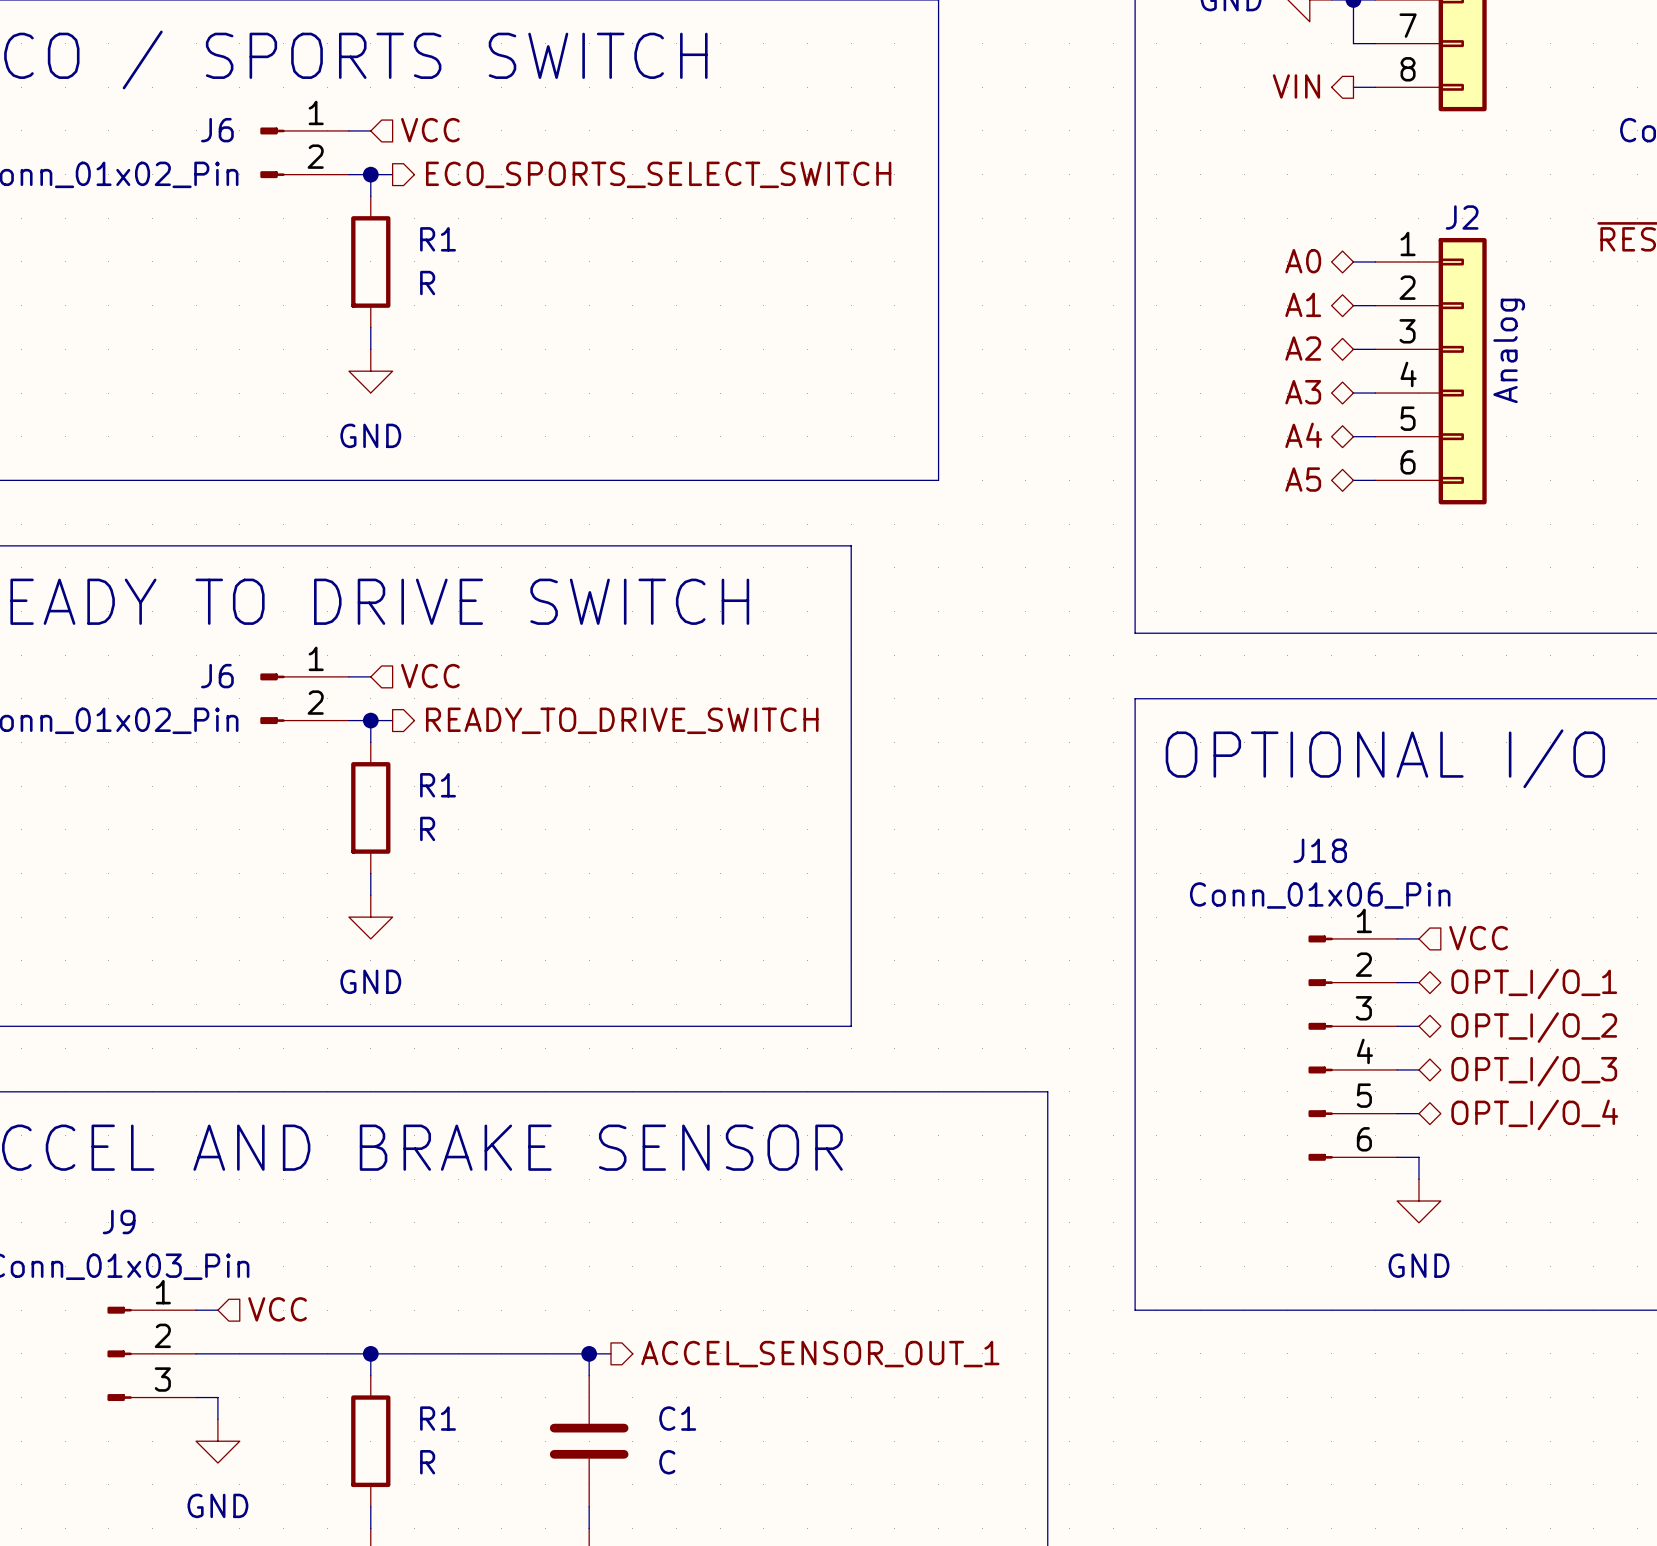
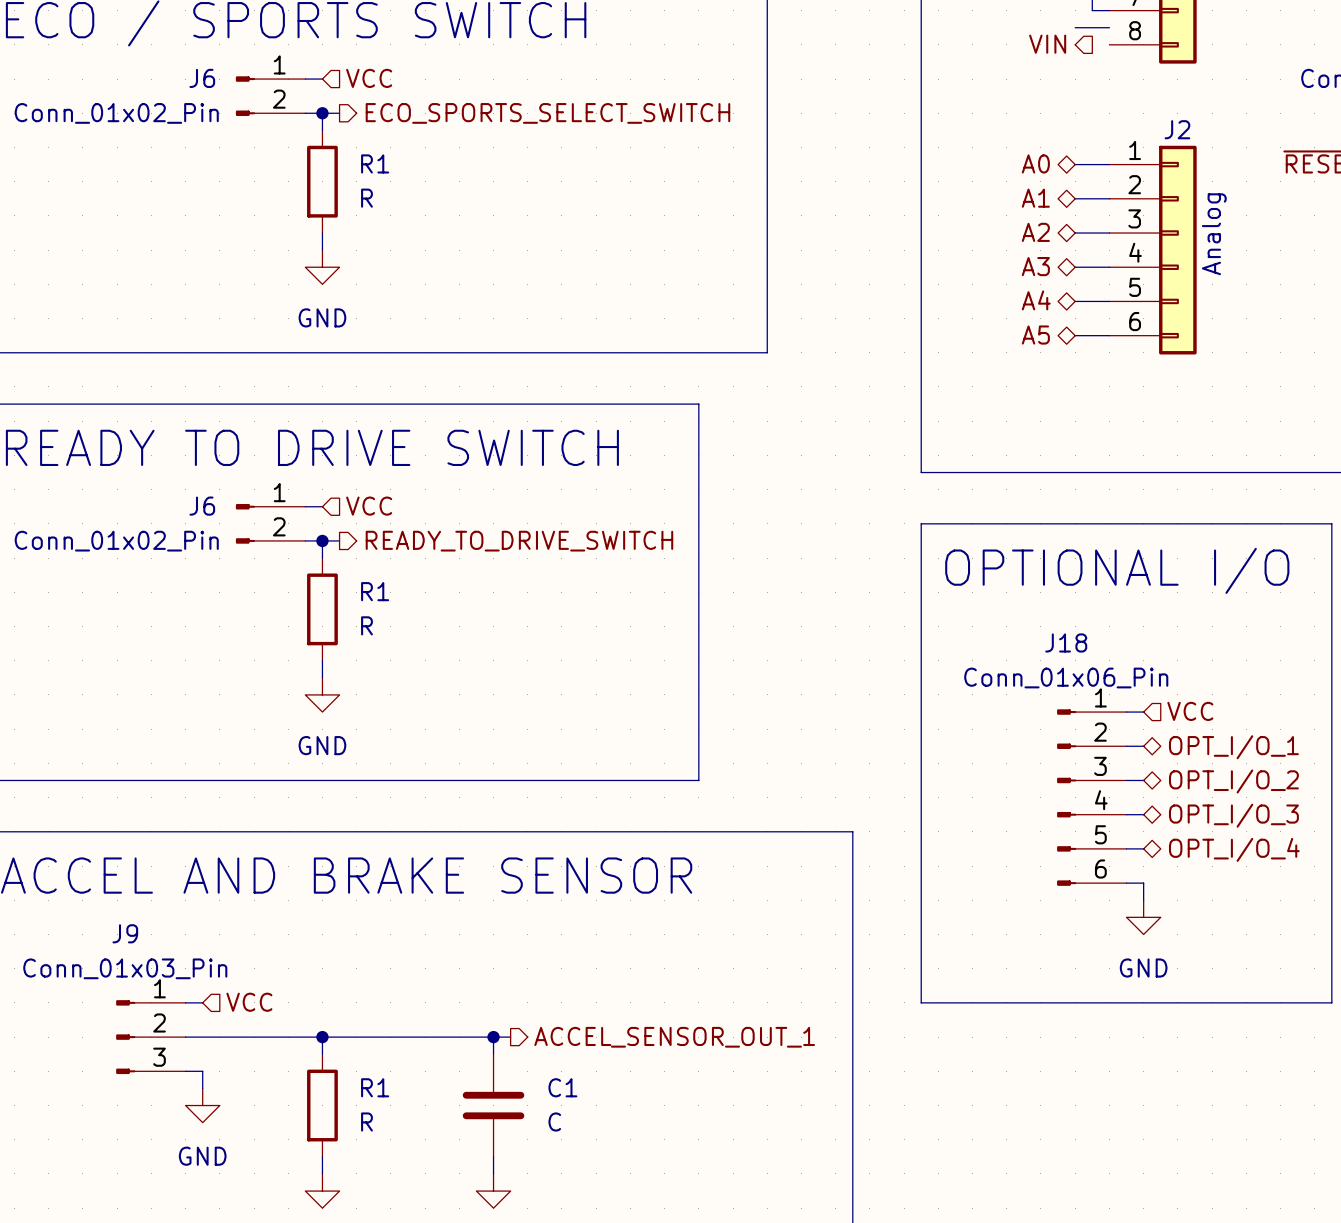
wire: none -> (1075, 27) (1109, 27)
wire: (1353, 87) (1375, 87) -> none
wire: none -> (1075, 164) (1109, 164)
hierarchical label position: A0 (1303, 261) -> A0 (1035, 163)
wire: (1353, 261) (1375, 261) -> none
wire: none -> (1075, 198) (1109, 198)
hierarchical label position: A1 (1303, 304) -> A1 (1035, 198)
wire: (1353, 305) (1375, 305) -> none
wire: none -> (1075, 233) (1109, 233)
hierarchical label position: A2 (1303, 348) -> A2 (1035, 232)
wire: (1353, 349) (1375, 349) -> none
wire: none -> (1075, 267) (1109, 267)
J2 position: (1431, 371) -> (1153, 250)
hierarchical label position: A3 (1303, 392) -> A3 (1035, 266)
wire: (1353, 393) (1375, 393) -> none
wire: none -> (1075, 301) (1109, 301)
hierarchical label position: A4 (1303, 435) -> A4 (1036, 300)
wire: (1353, 436) (1375, 436) -> none
wire: none -> (1075, 335) (1109, 335)
hierarchical label position: A5 (1303, 479) -> A5 (1035, 335)
wire: (1353, 480) (1375, 480) -> none

